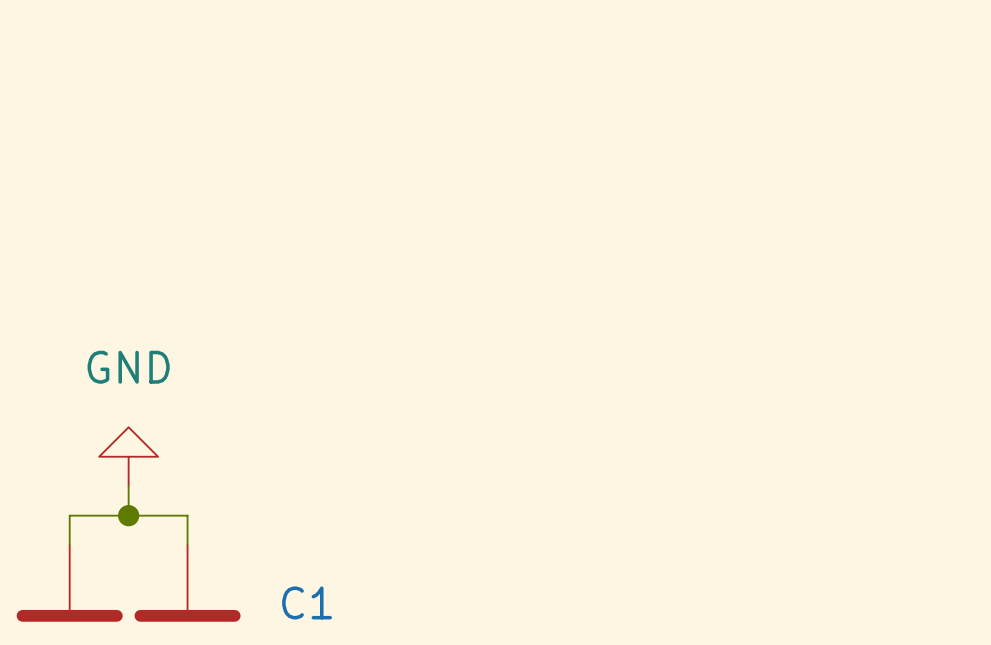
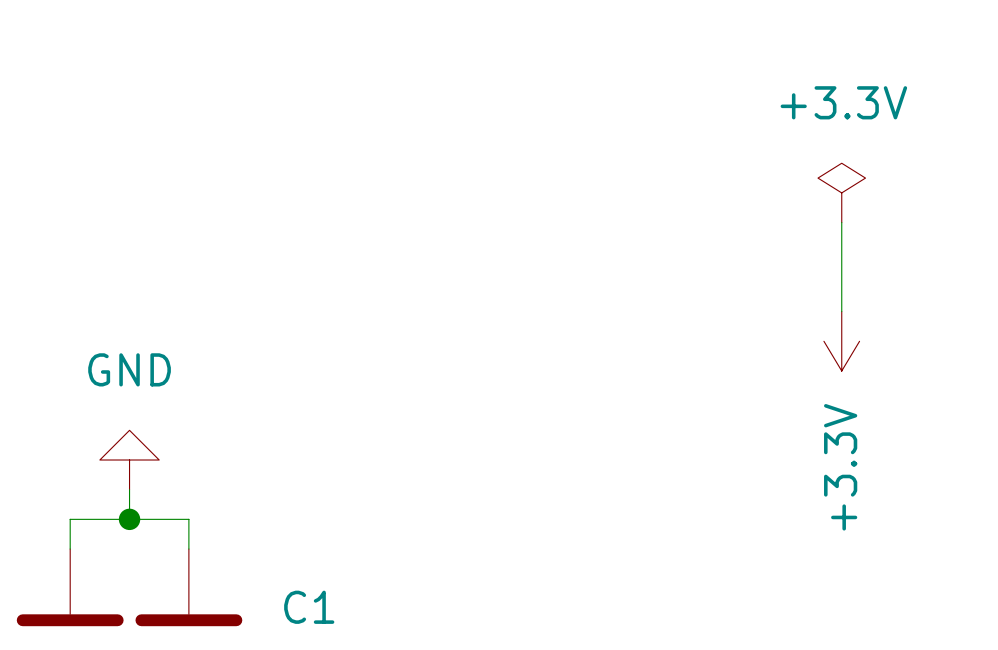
power symbol: none -> +3.3V (841, 192)
wire: none -> (841, 222) (841, 311)
power symbol: none -> +3.3V (841, 341)

